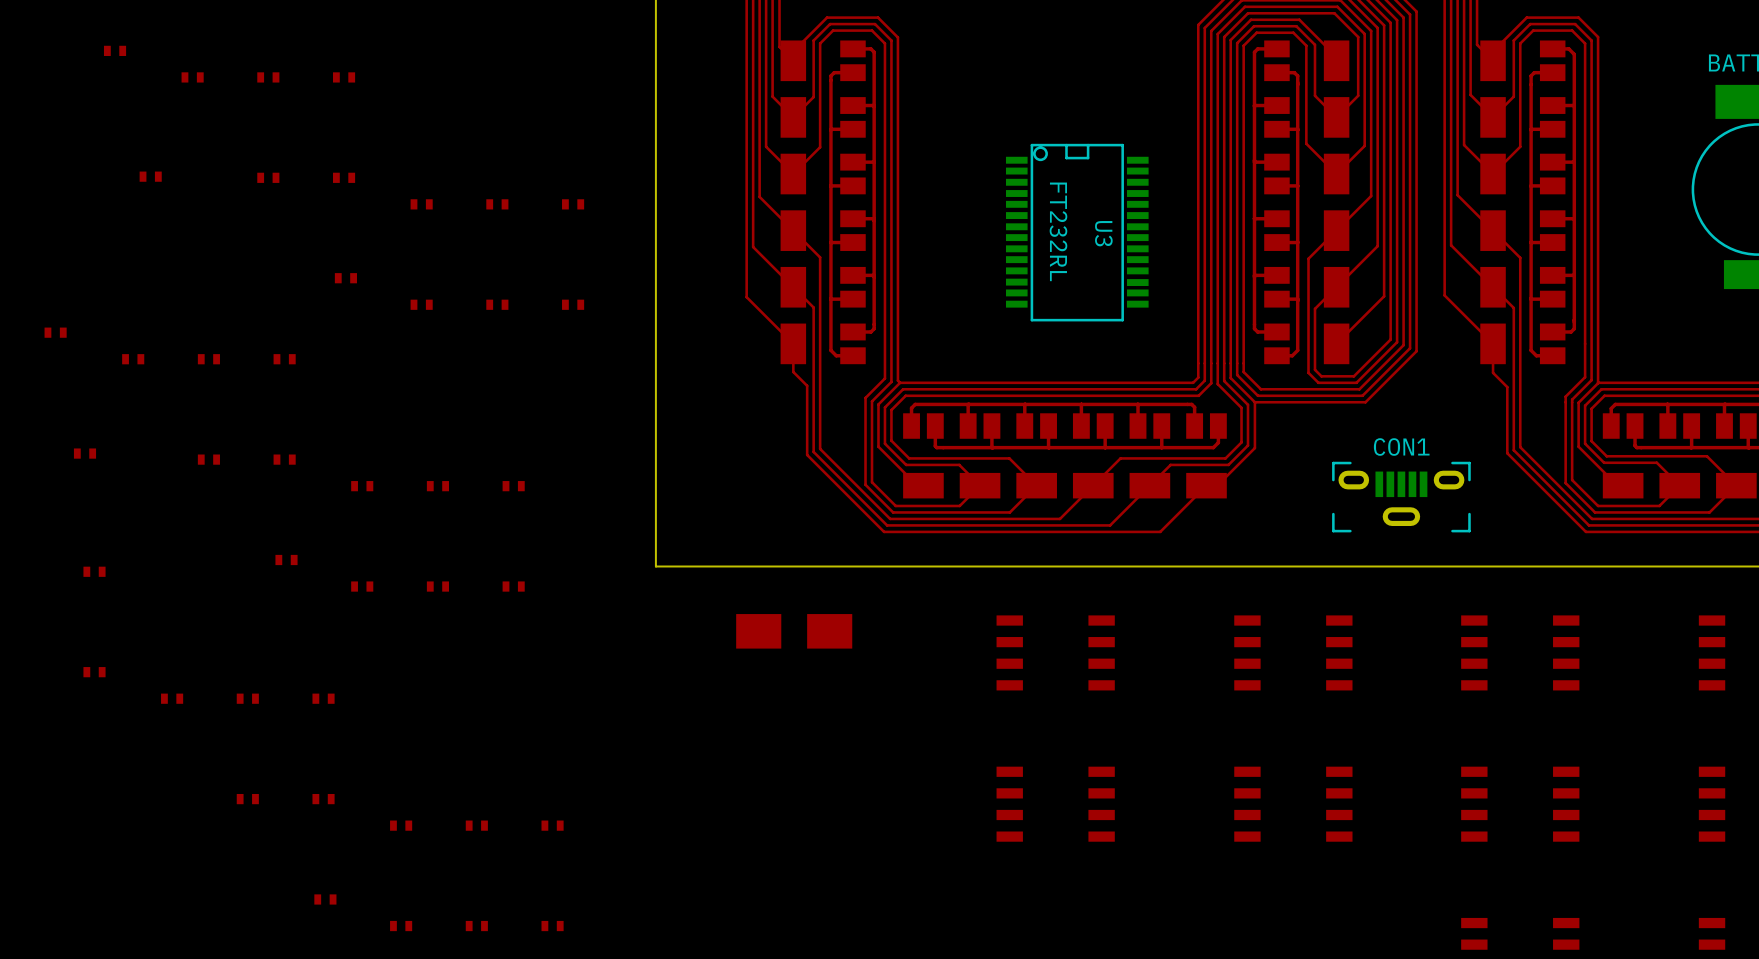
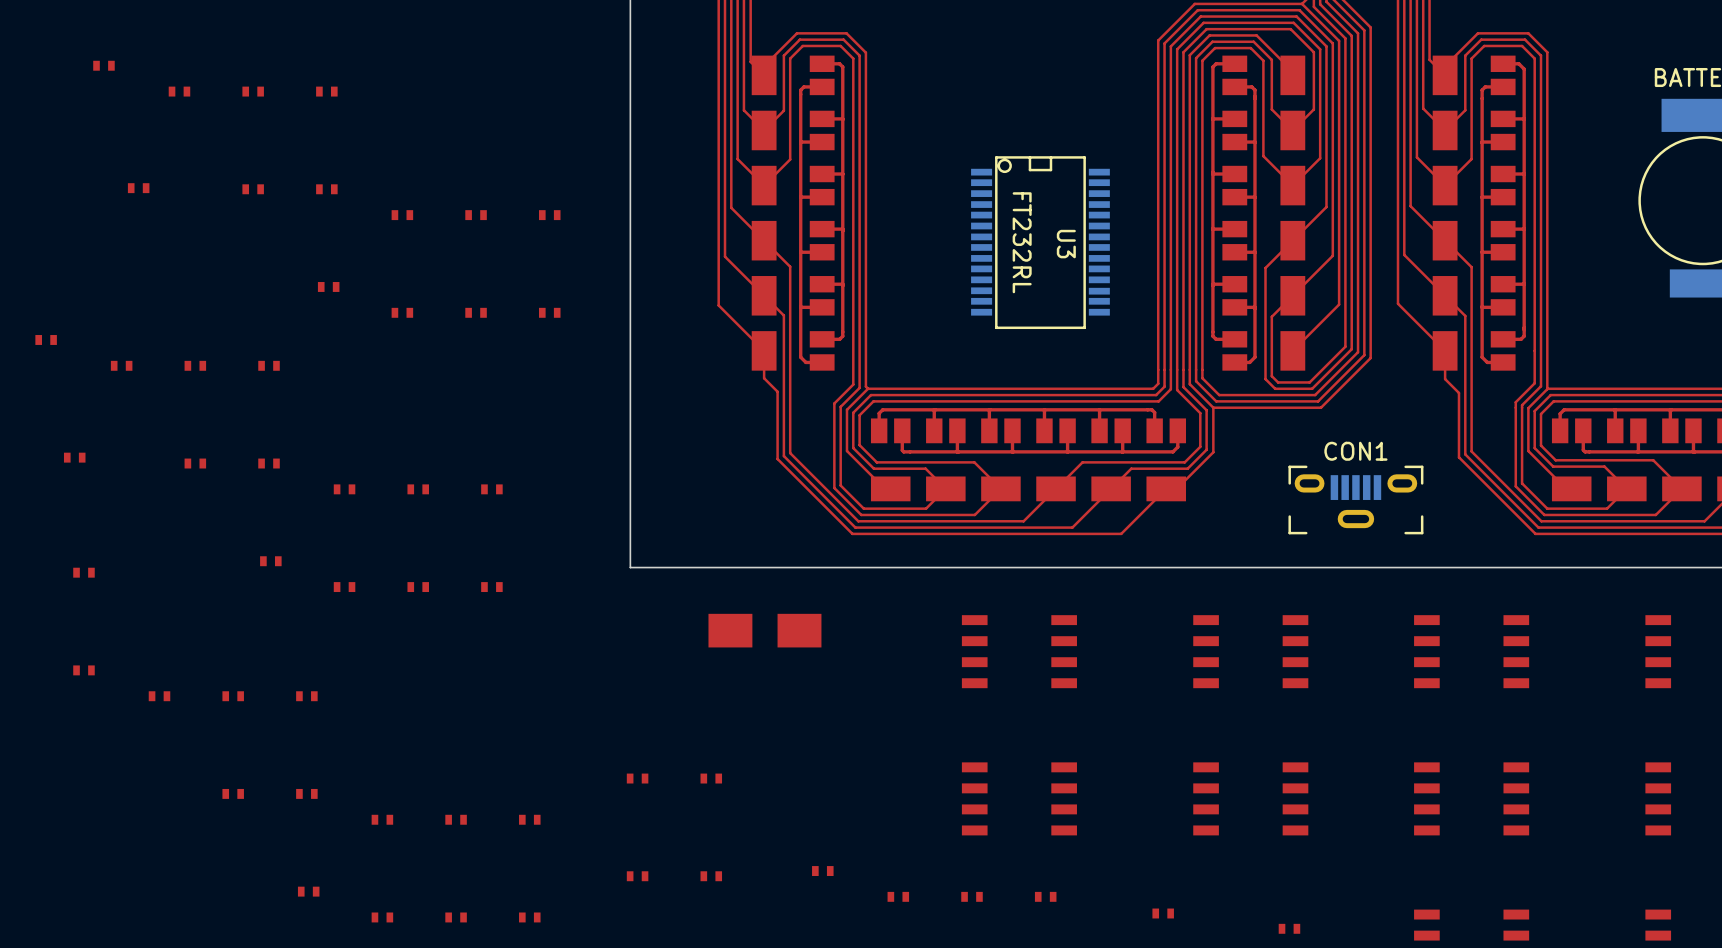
part: none -> (637, 778)
part: none -> (711, 778)
part: none -> (822, 871)
part: none -> (637, 876)
part: none -> (711, 876)
part: none -> (898, 896)
part: none -> (972, 896)
part: none -> (1045, 896)
part: none -> (1163, 913)
part: none -> (1289, 928)

